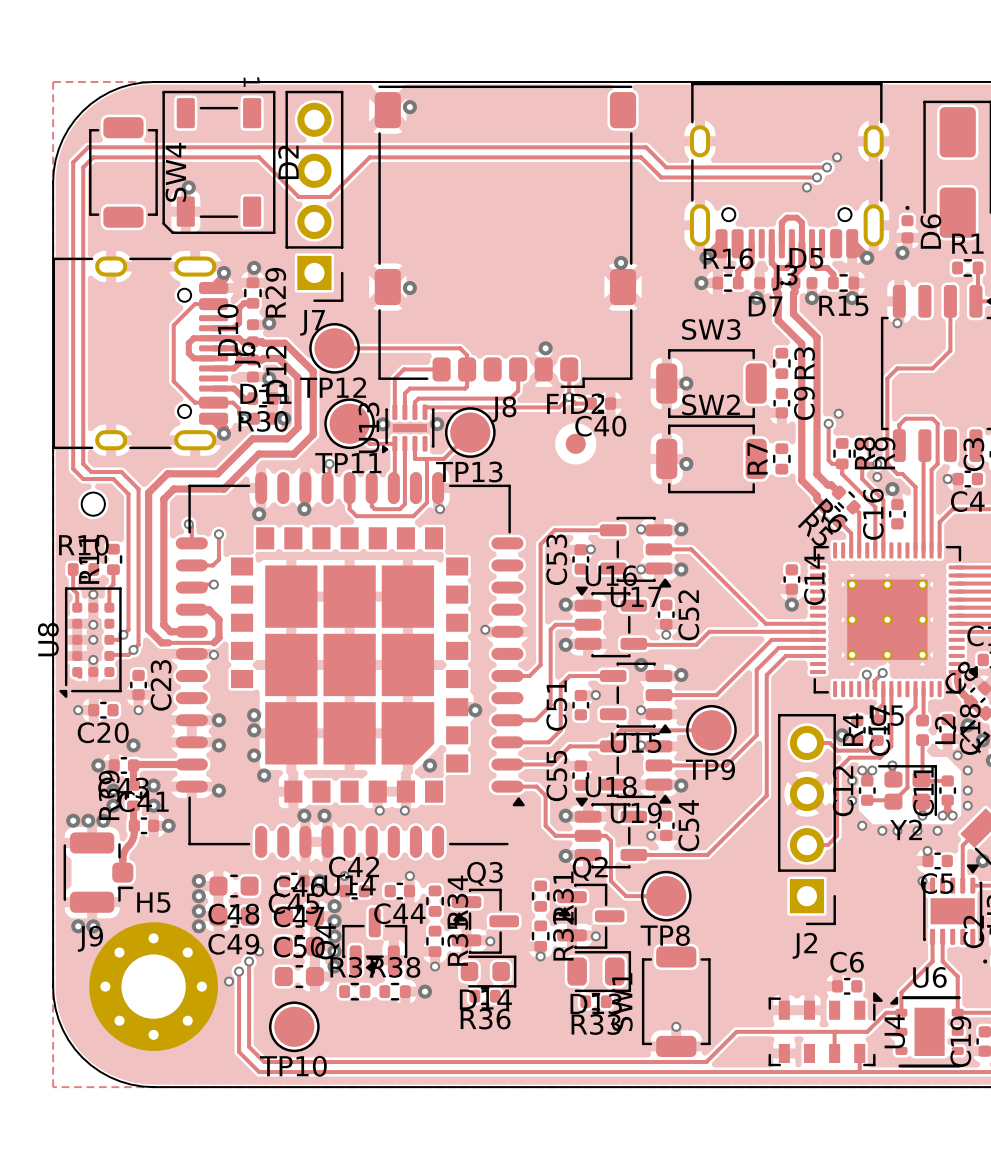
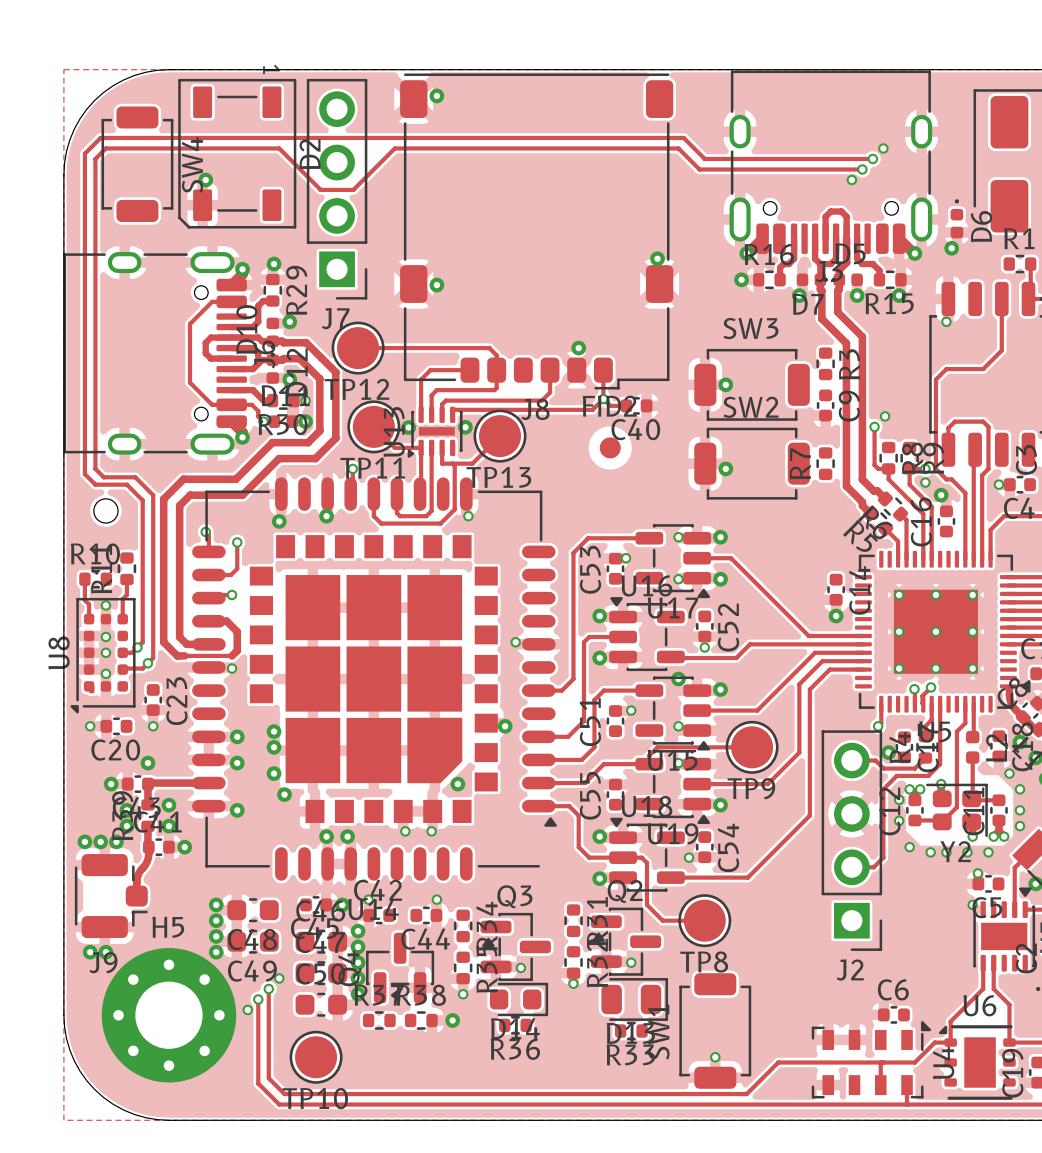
track: none -> (881, 704) (881, 723) (878, 726)
via: none -> (878, 726)

